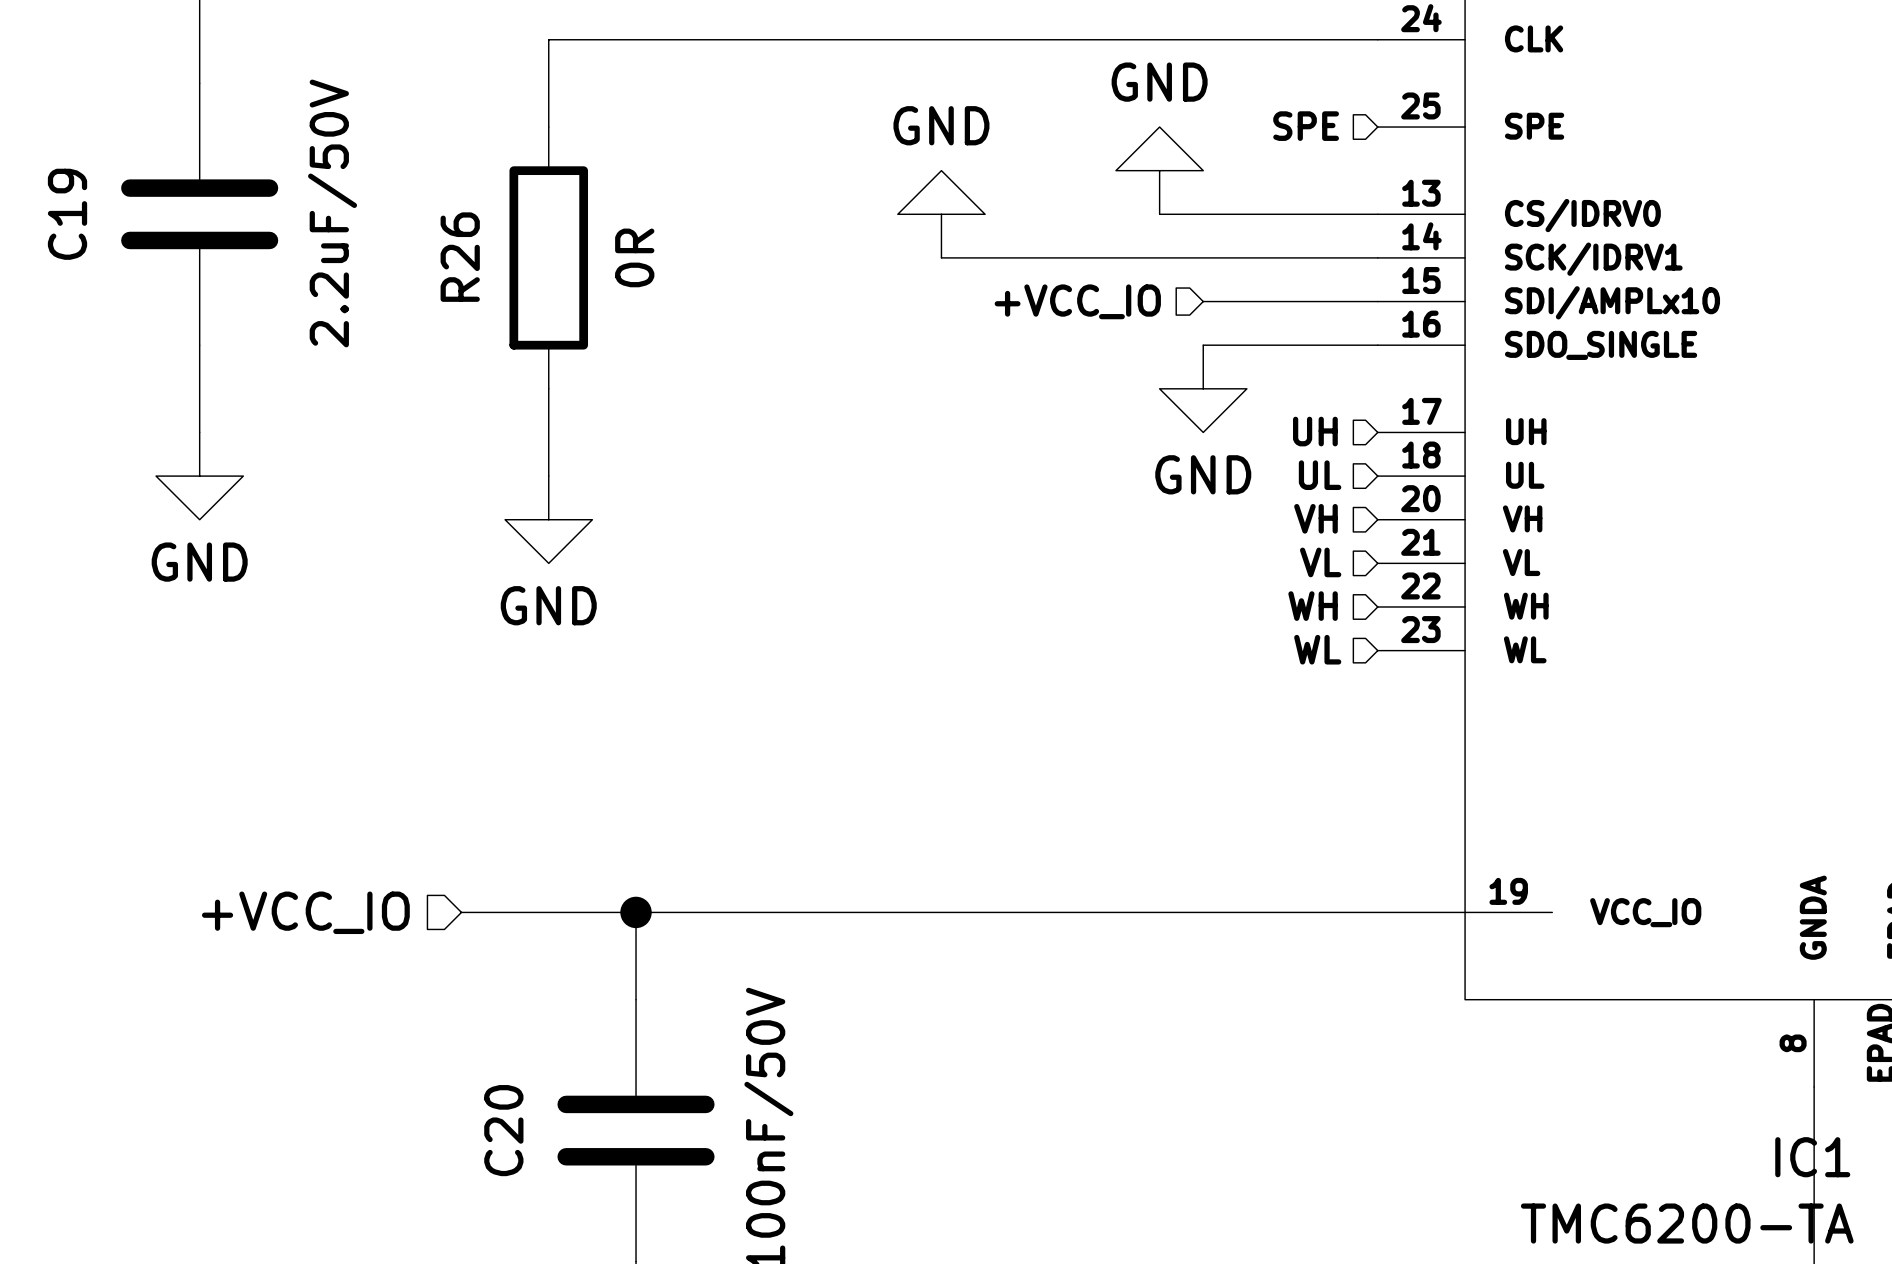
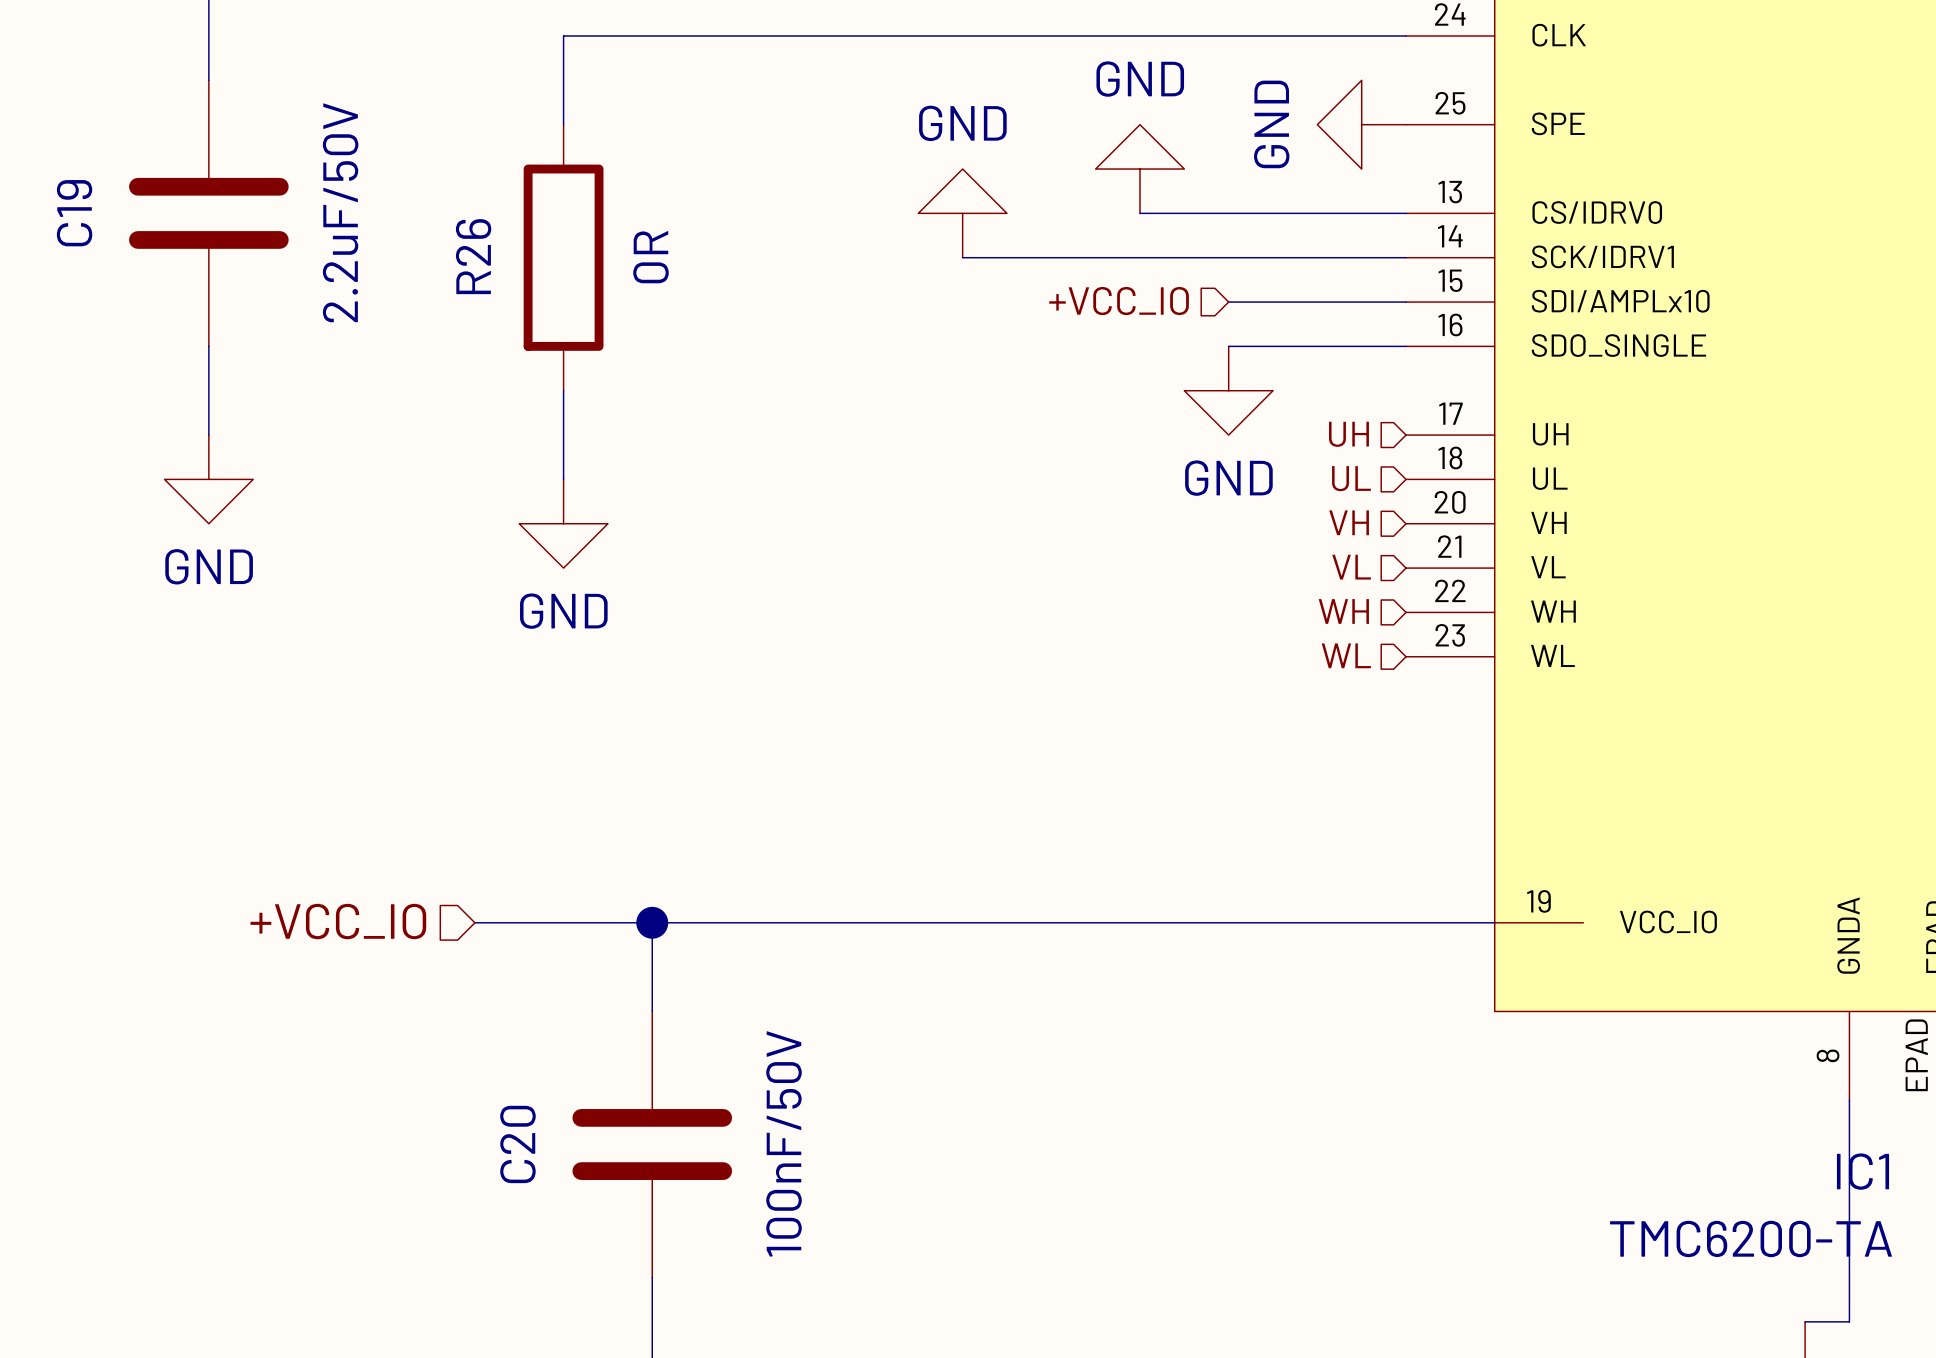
hierarchical label: SPE (1306, 126) -> none
power symbol: none -> GND (1361, 124)
power symbol position: GND (1159, 170) -> GND (1140, 169)
wire: none -> (1140, 213) (1184, 213)

